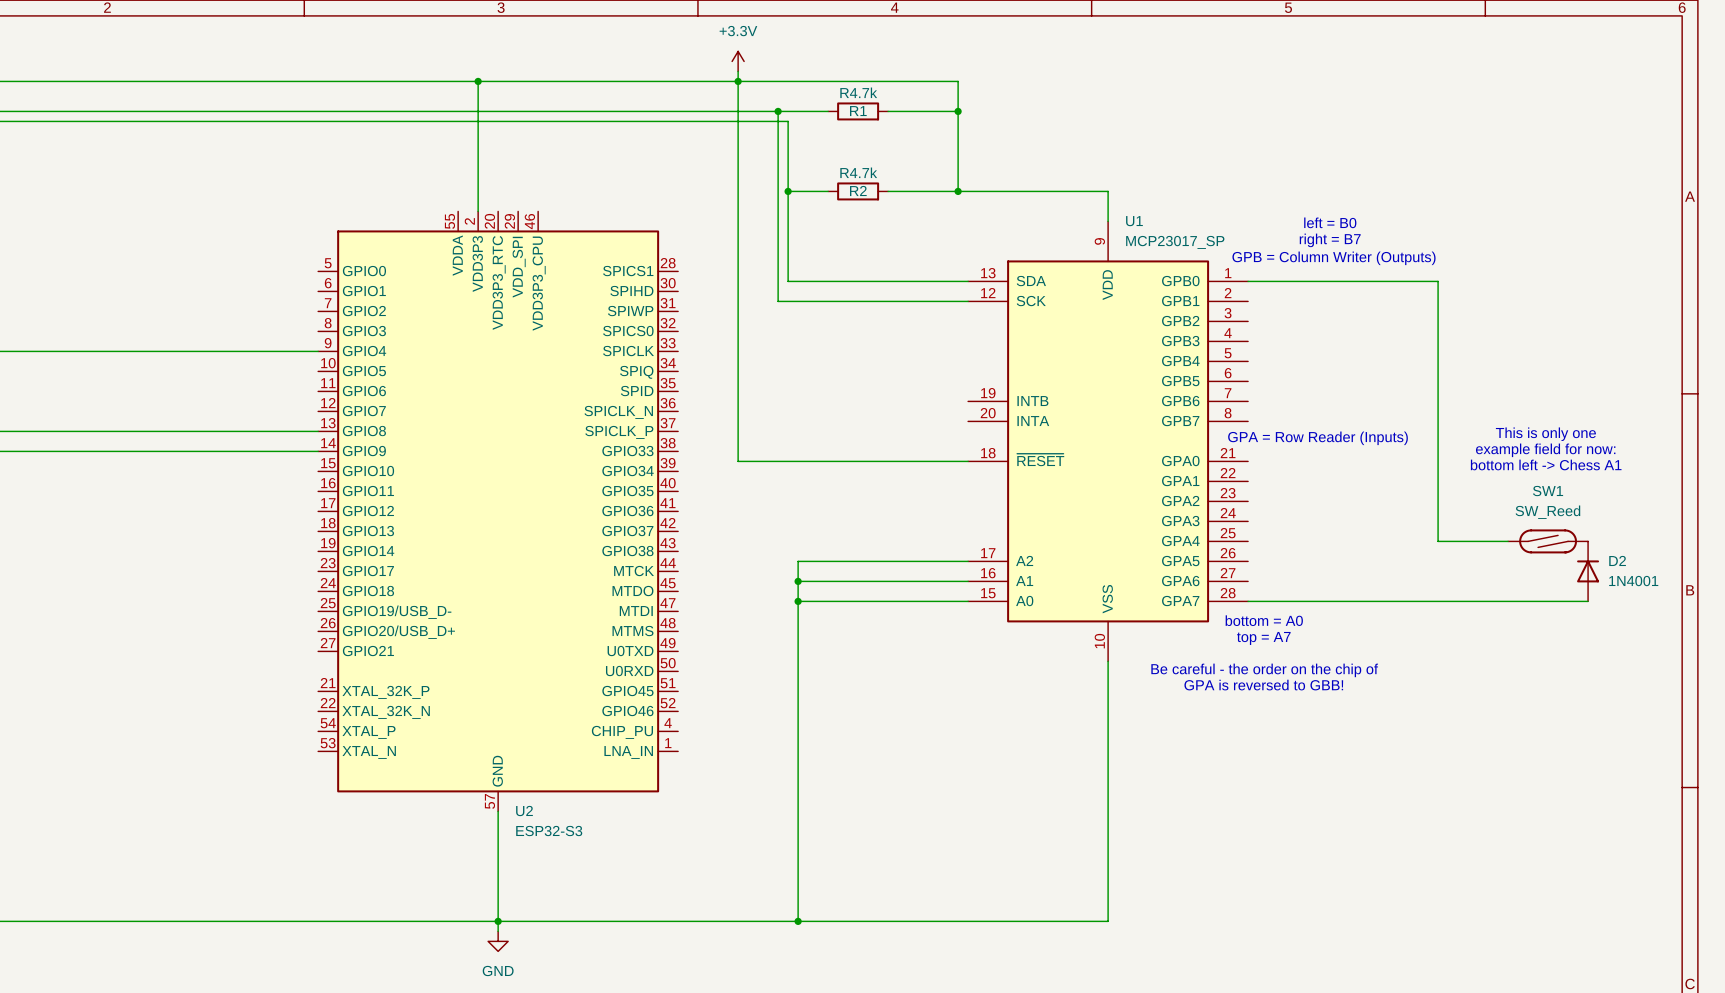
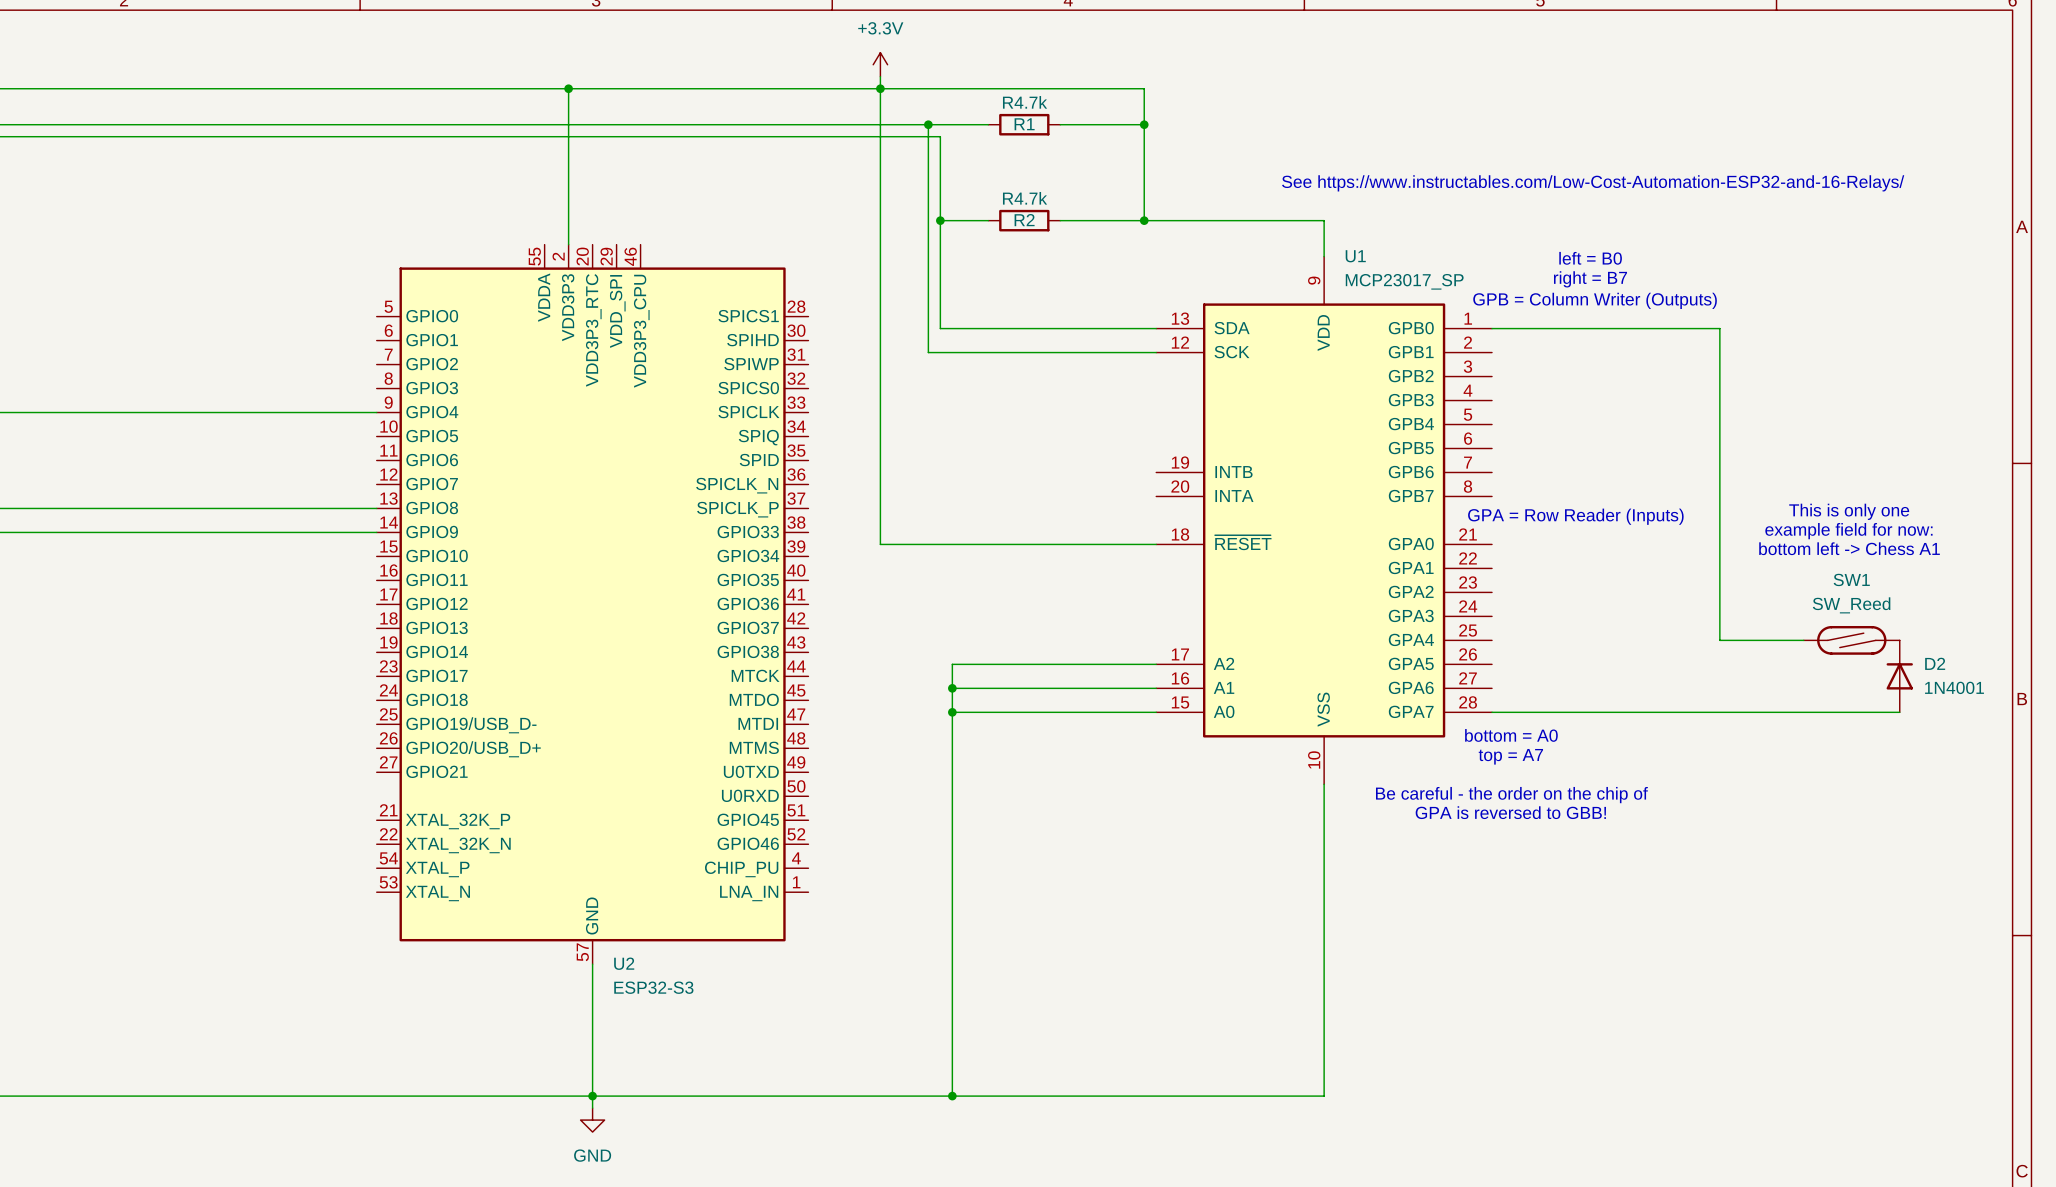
text: none -> See https://www.instructables.com/Low-Cost-Automation-ESP32-and-16-Relays/ (1593, 183)

